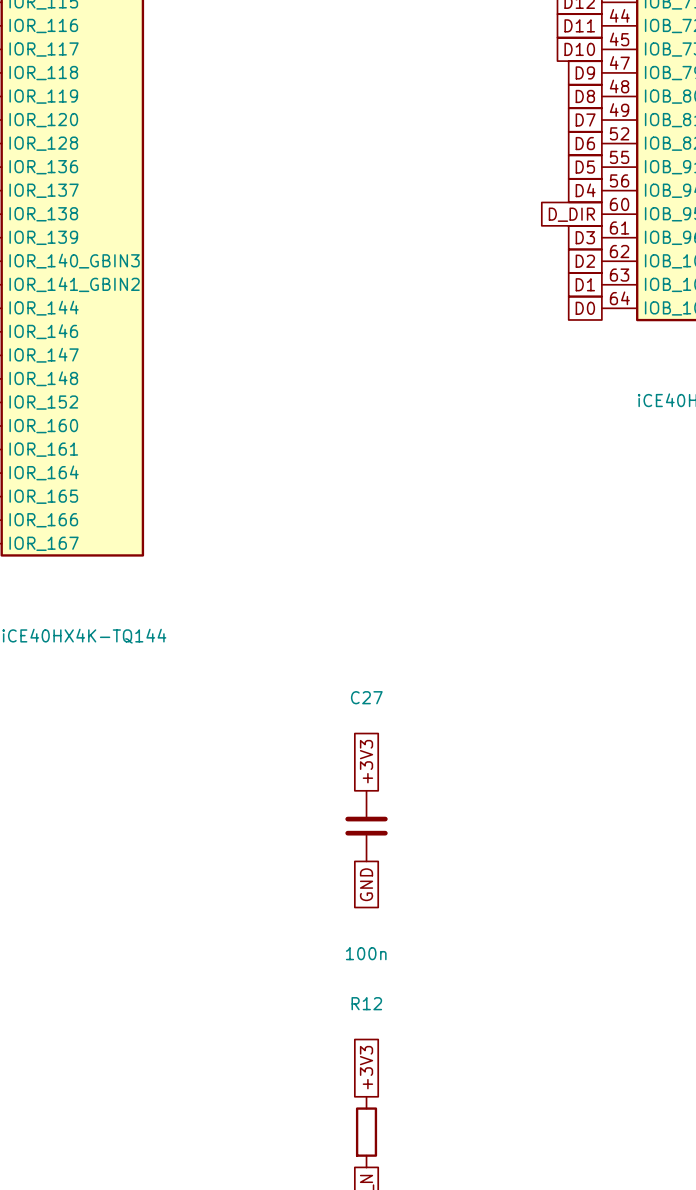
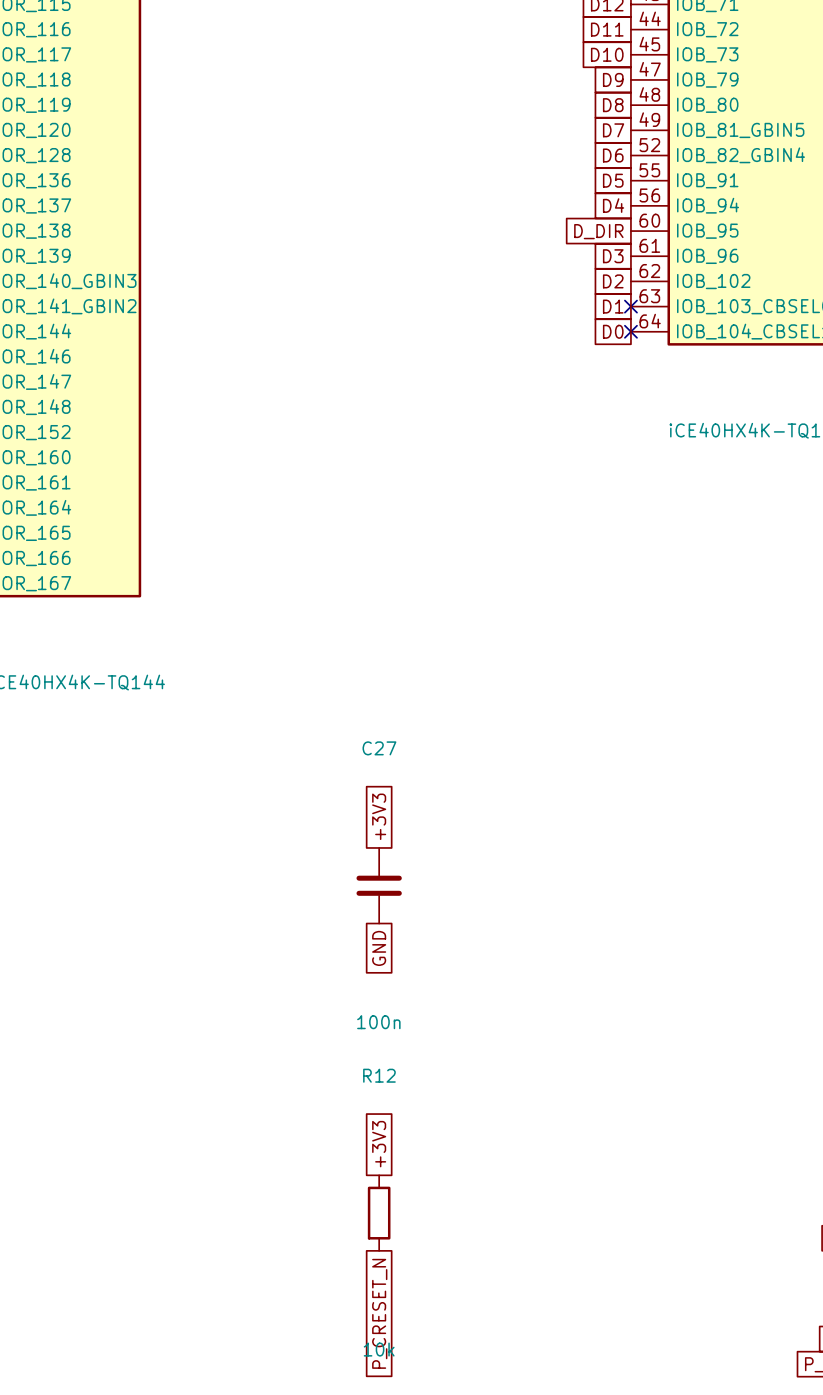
no-connect mark: none -> (630, 306)
no-connect mark: none -> (630, 331)

